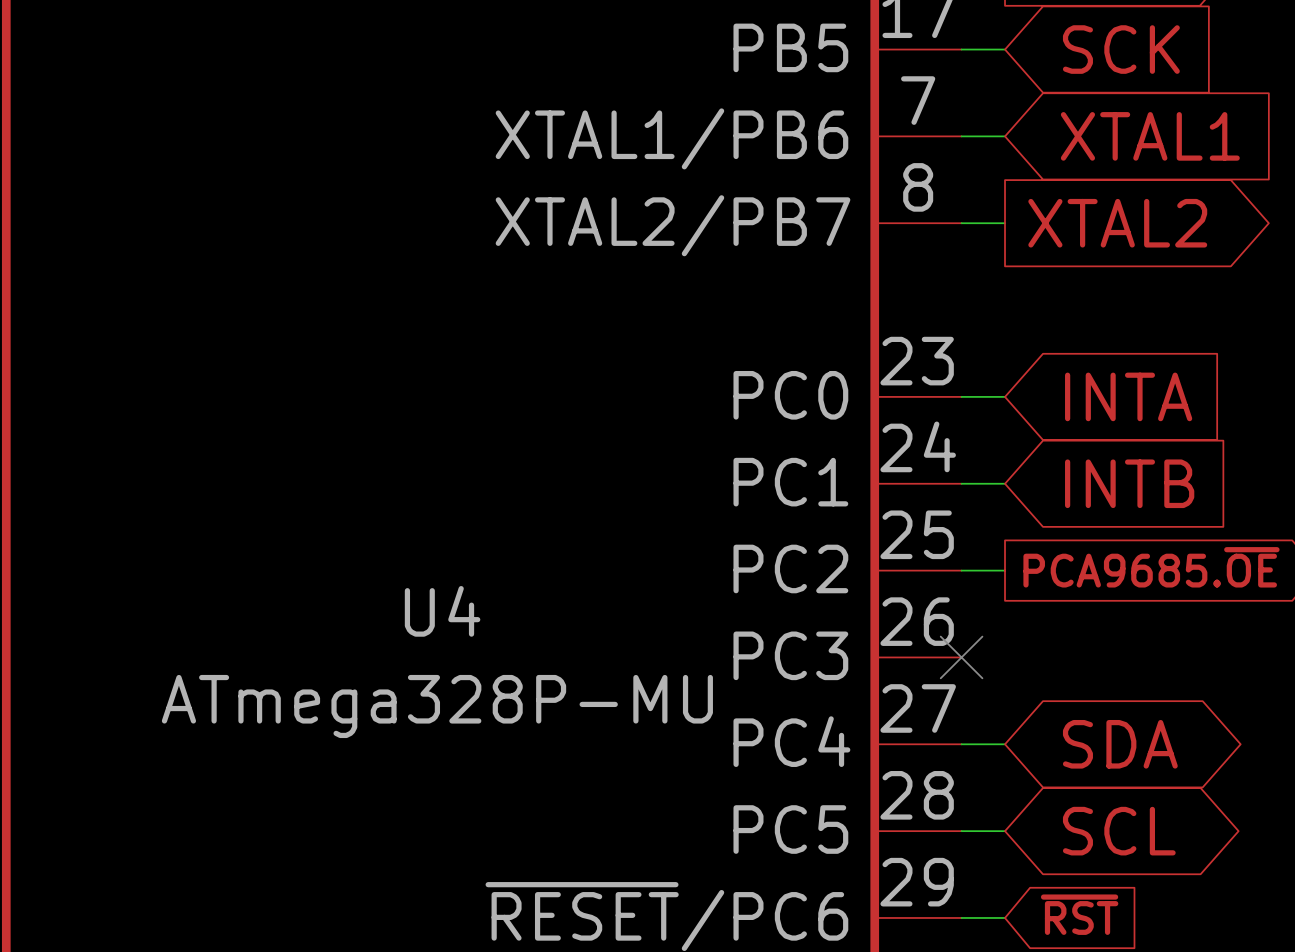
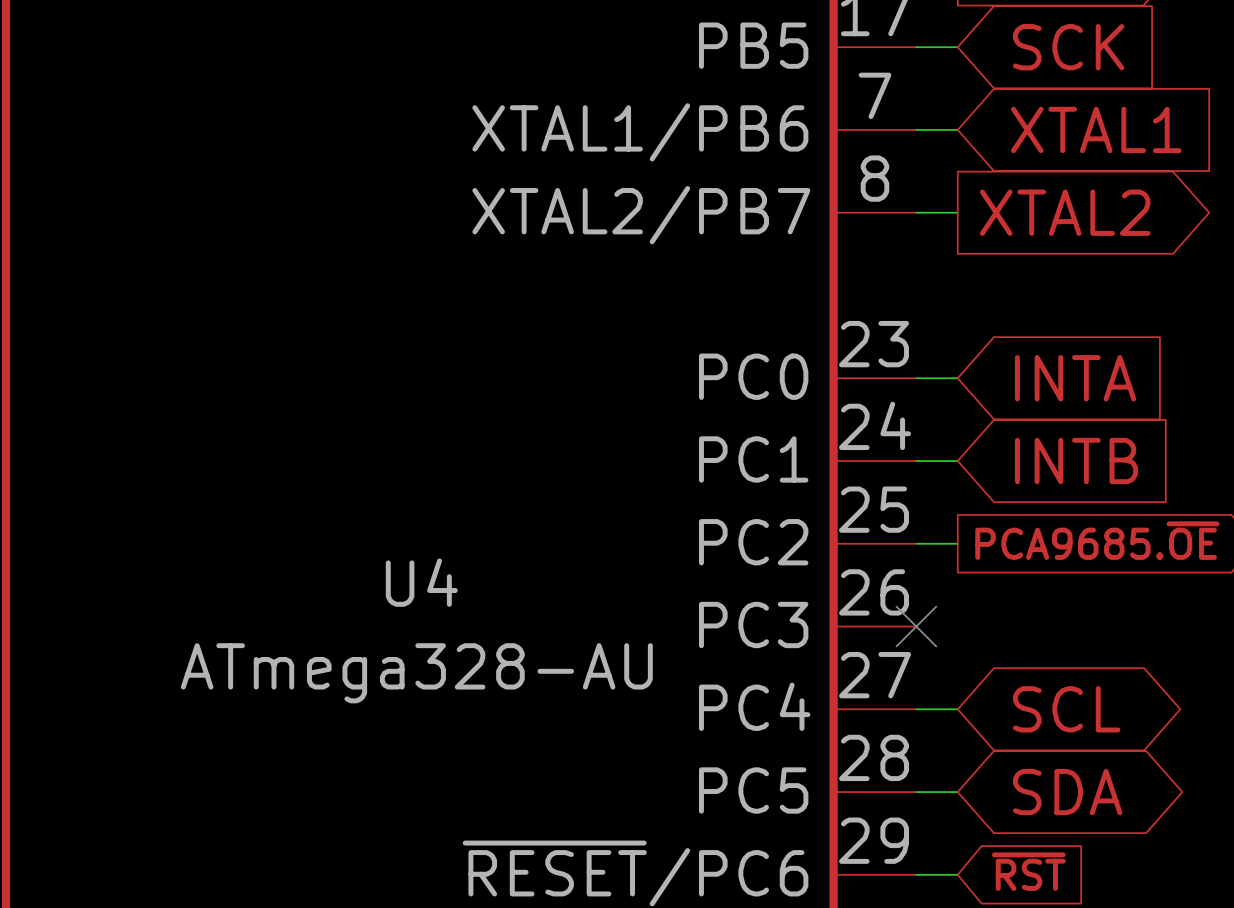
U4 value: ATmega328P-MU (437, 706) -> ATmega328-AU (416, 673)
global label: SDA (1120, 744) -> SCL (1066, 709)
global label: SCL (1119, 831) -> SDA (1067, 792)

